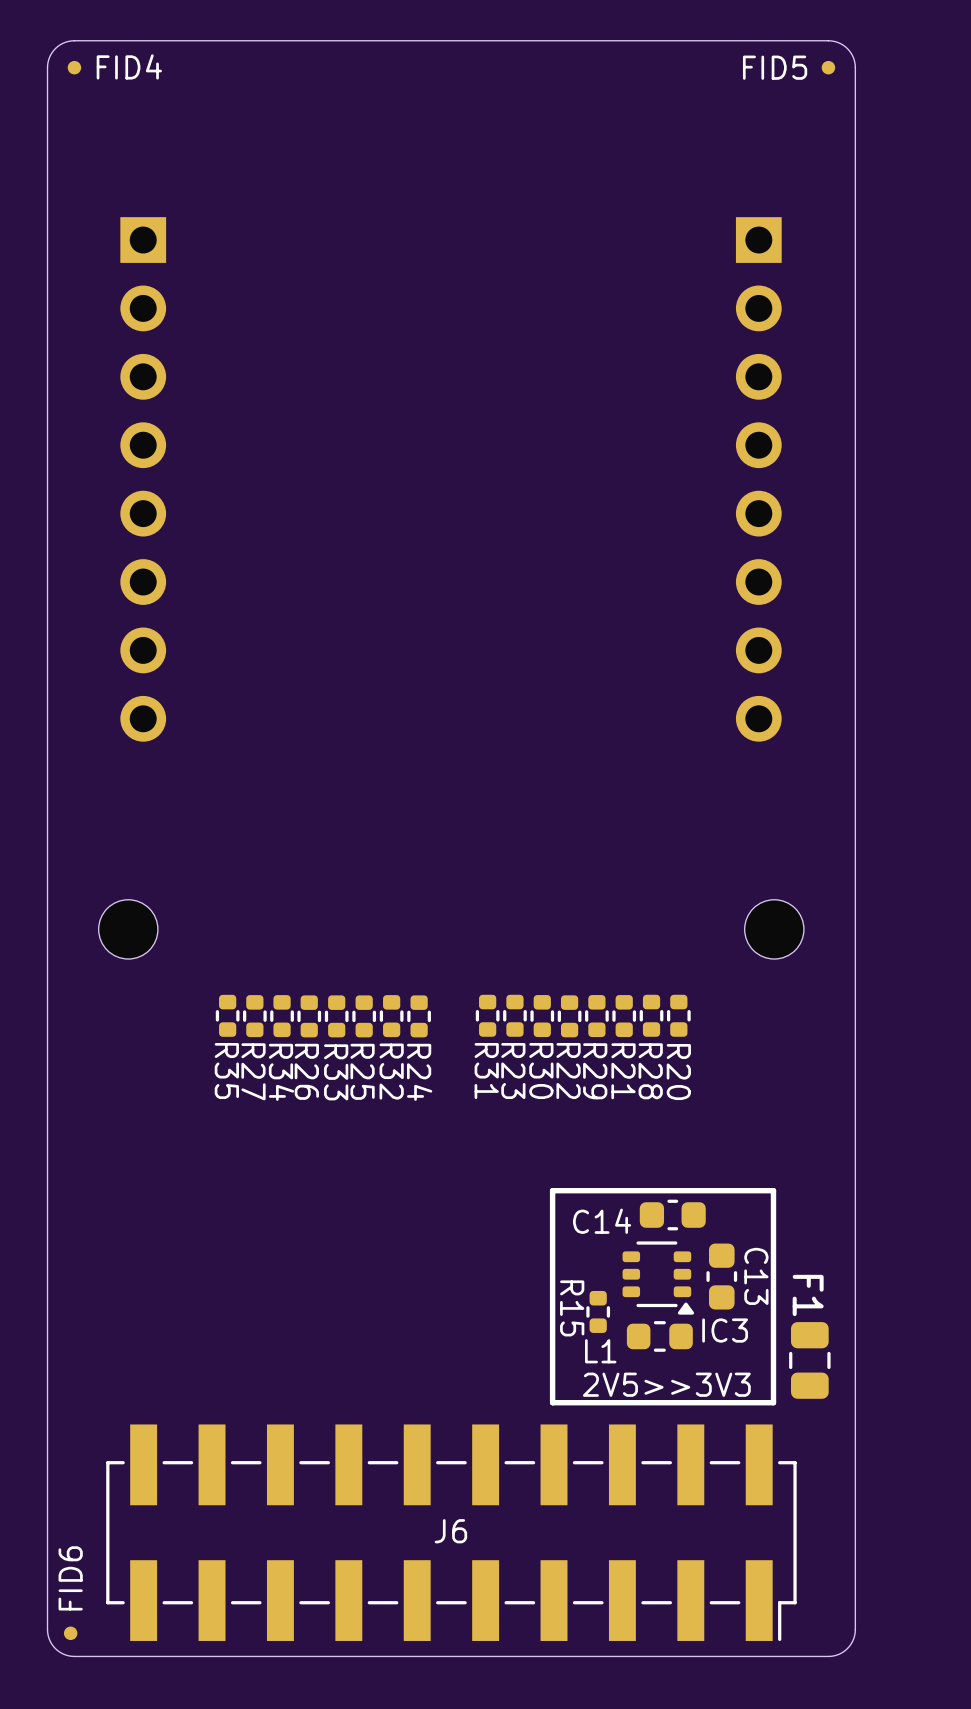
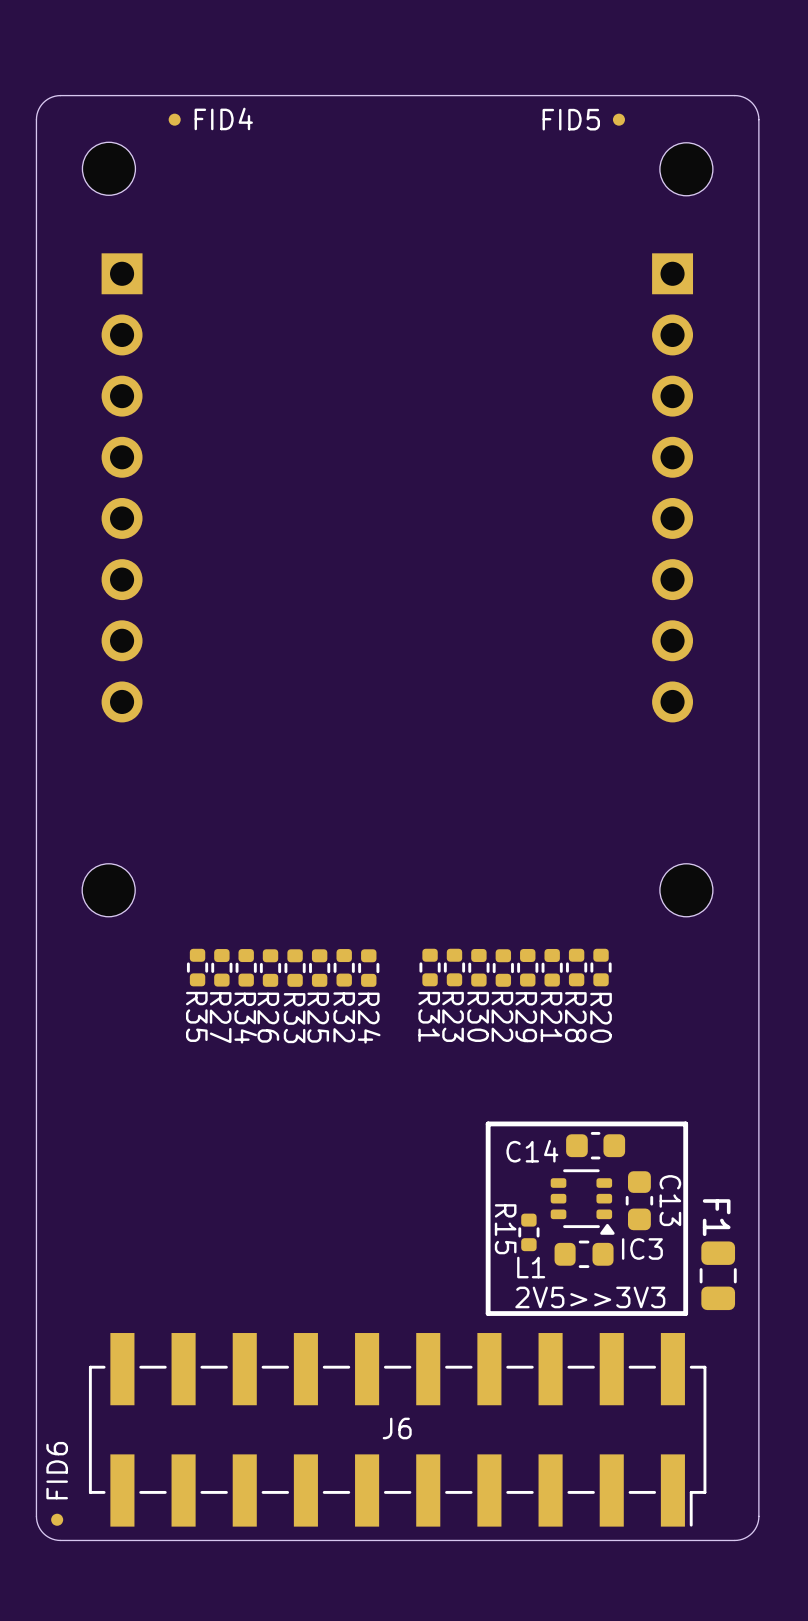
FID4 position: (74, 67) -> (174, 119)
FID5 position: (828, 67) -> (618, 119)
part: none -> (108, 168)
part: none -> (686, 169)

